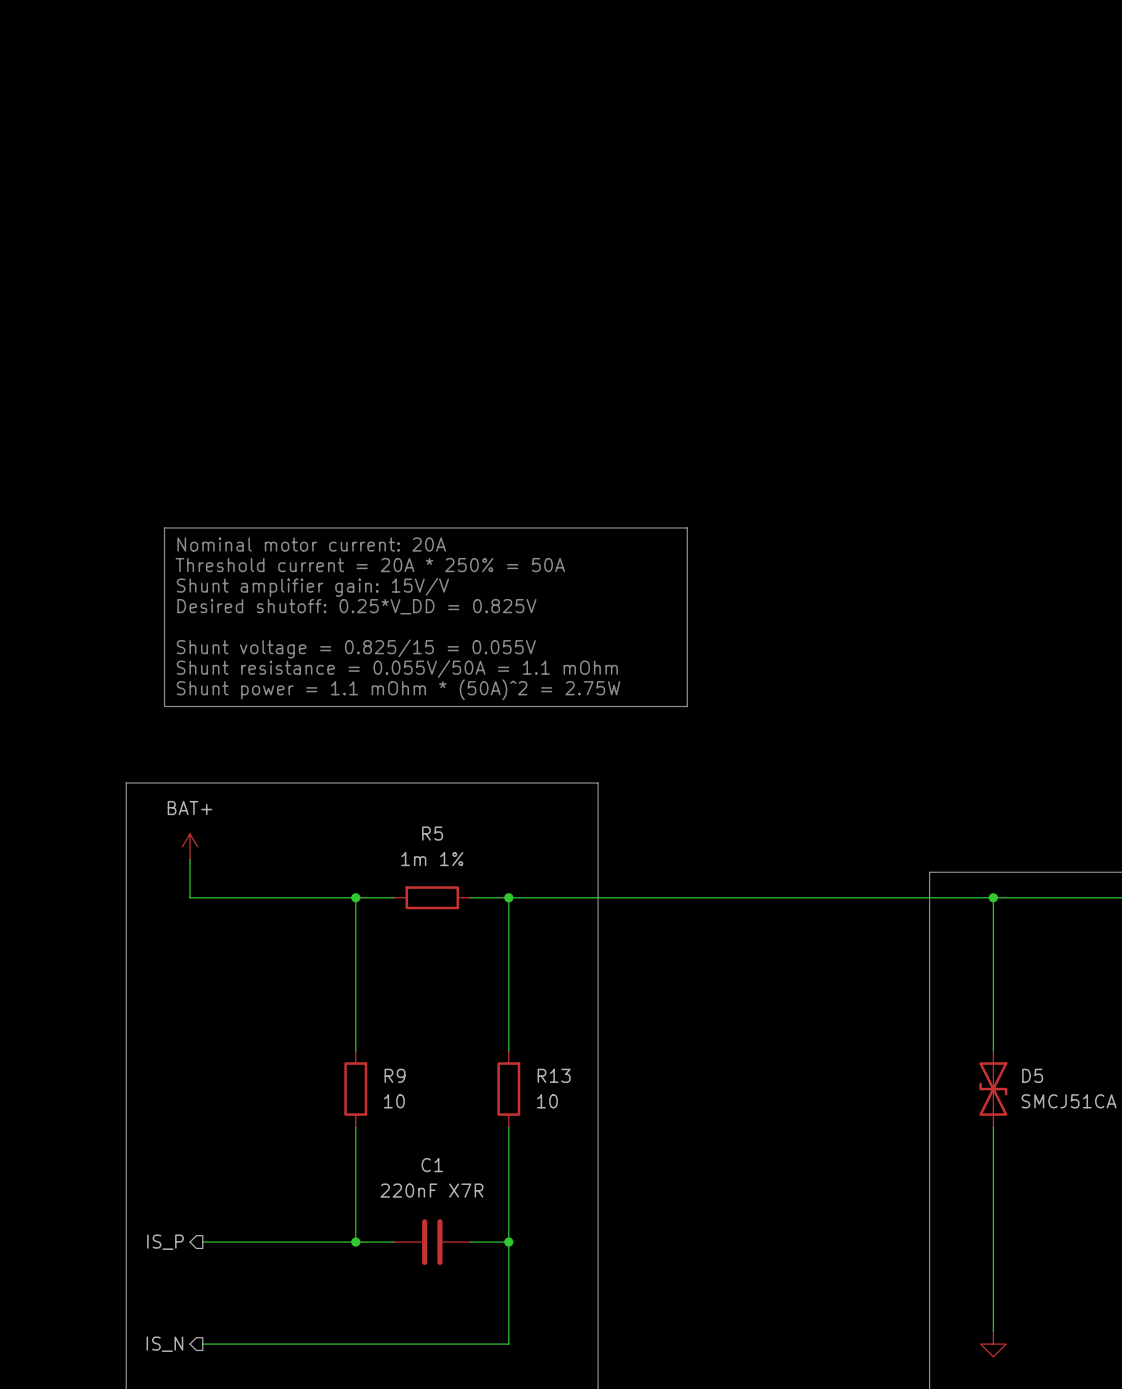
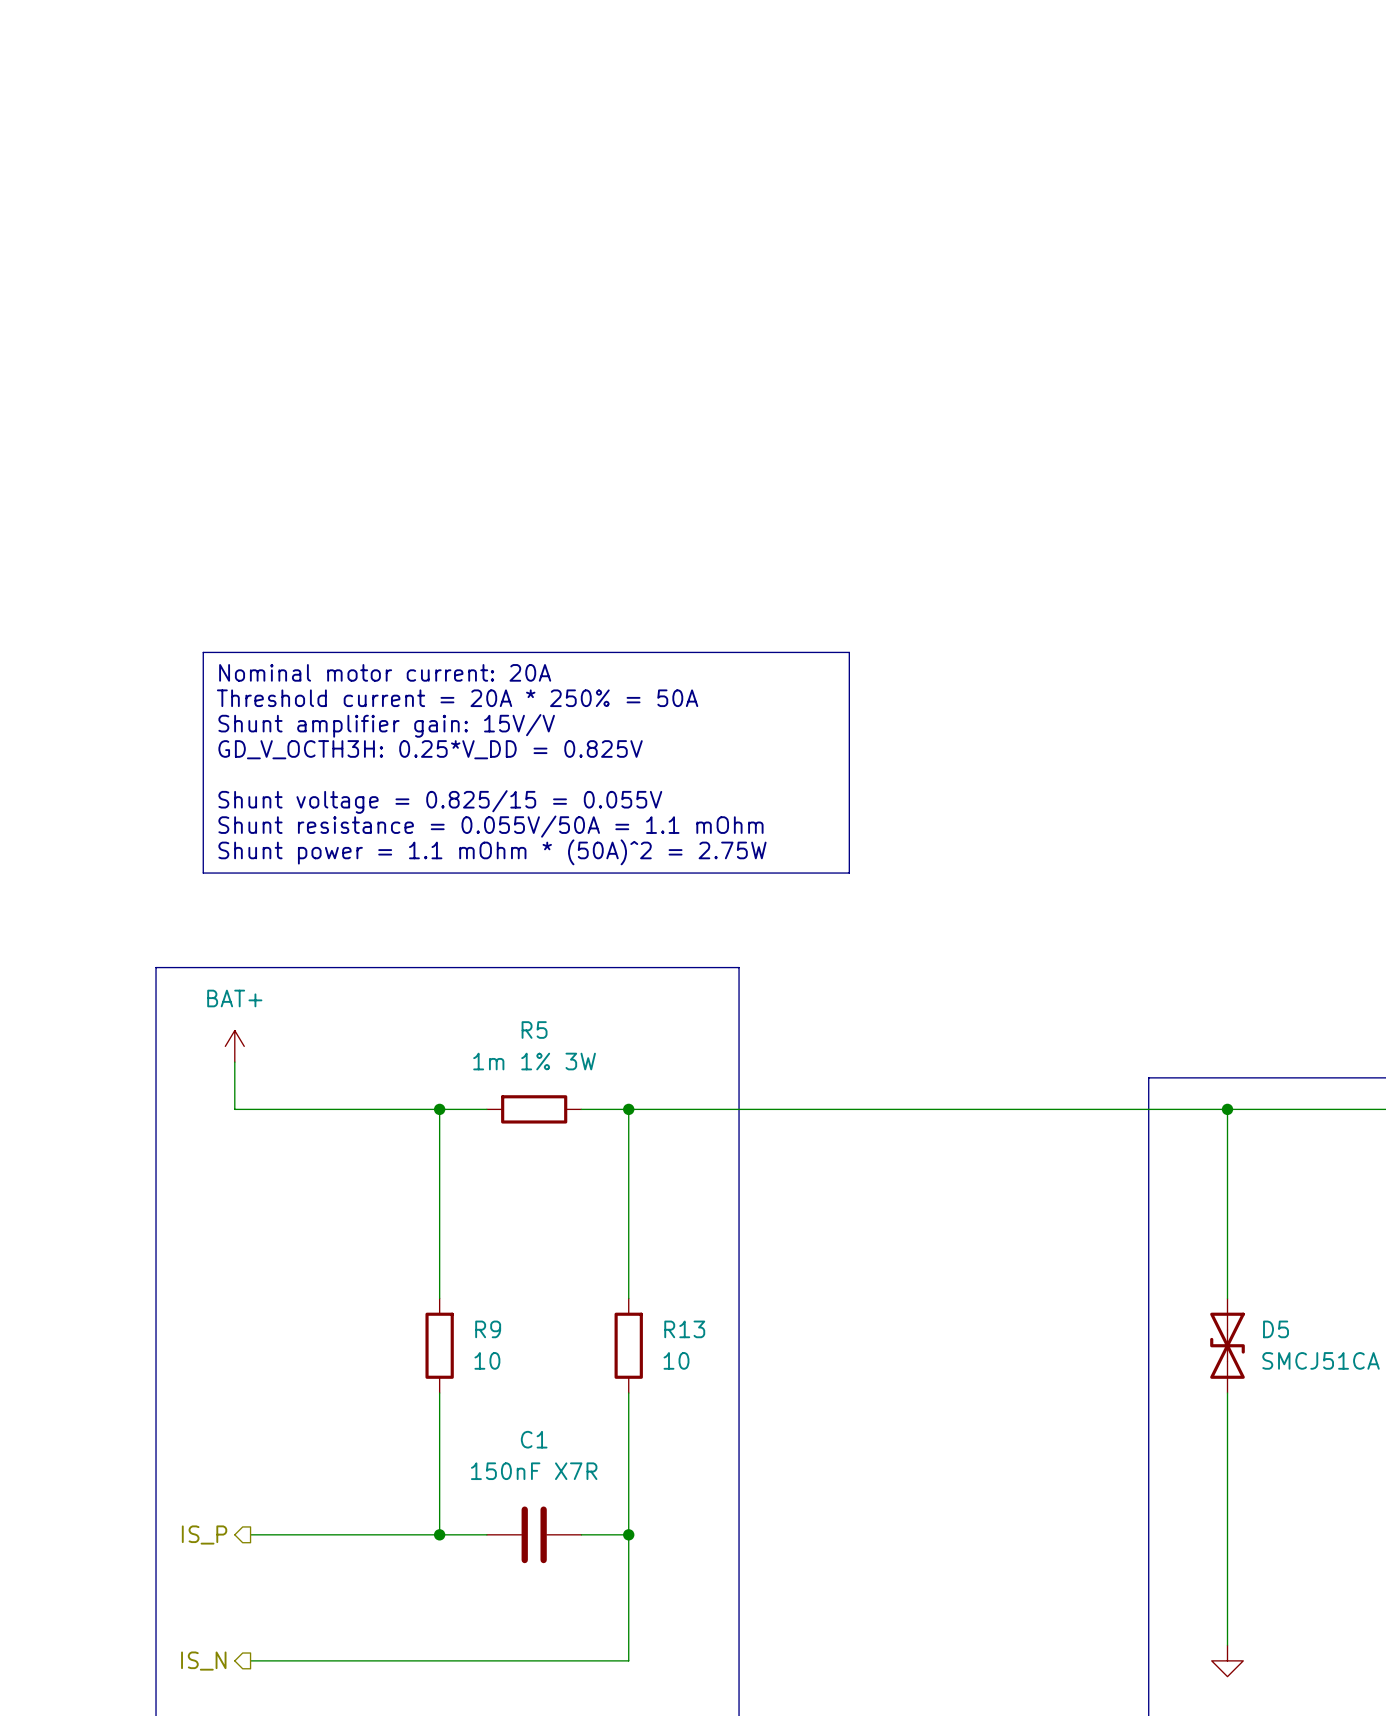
text: Desired shutoff: 0.25*V_DD = 0.825V (356, 606) -> GD_V_OCTH3H: 0.25*V_DD = 0.825V (430, 749)
R5 value: 1m 1% (432, 859) -> 1m 1% 3W (534, 1061)
C1 value: 220nF X7R (431, 1190) -> 150nF X7R (534, 1471)

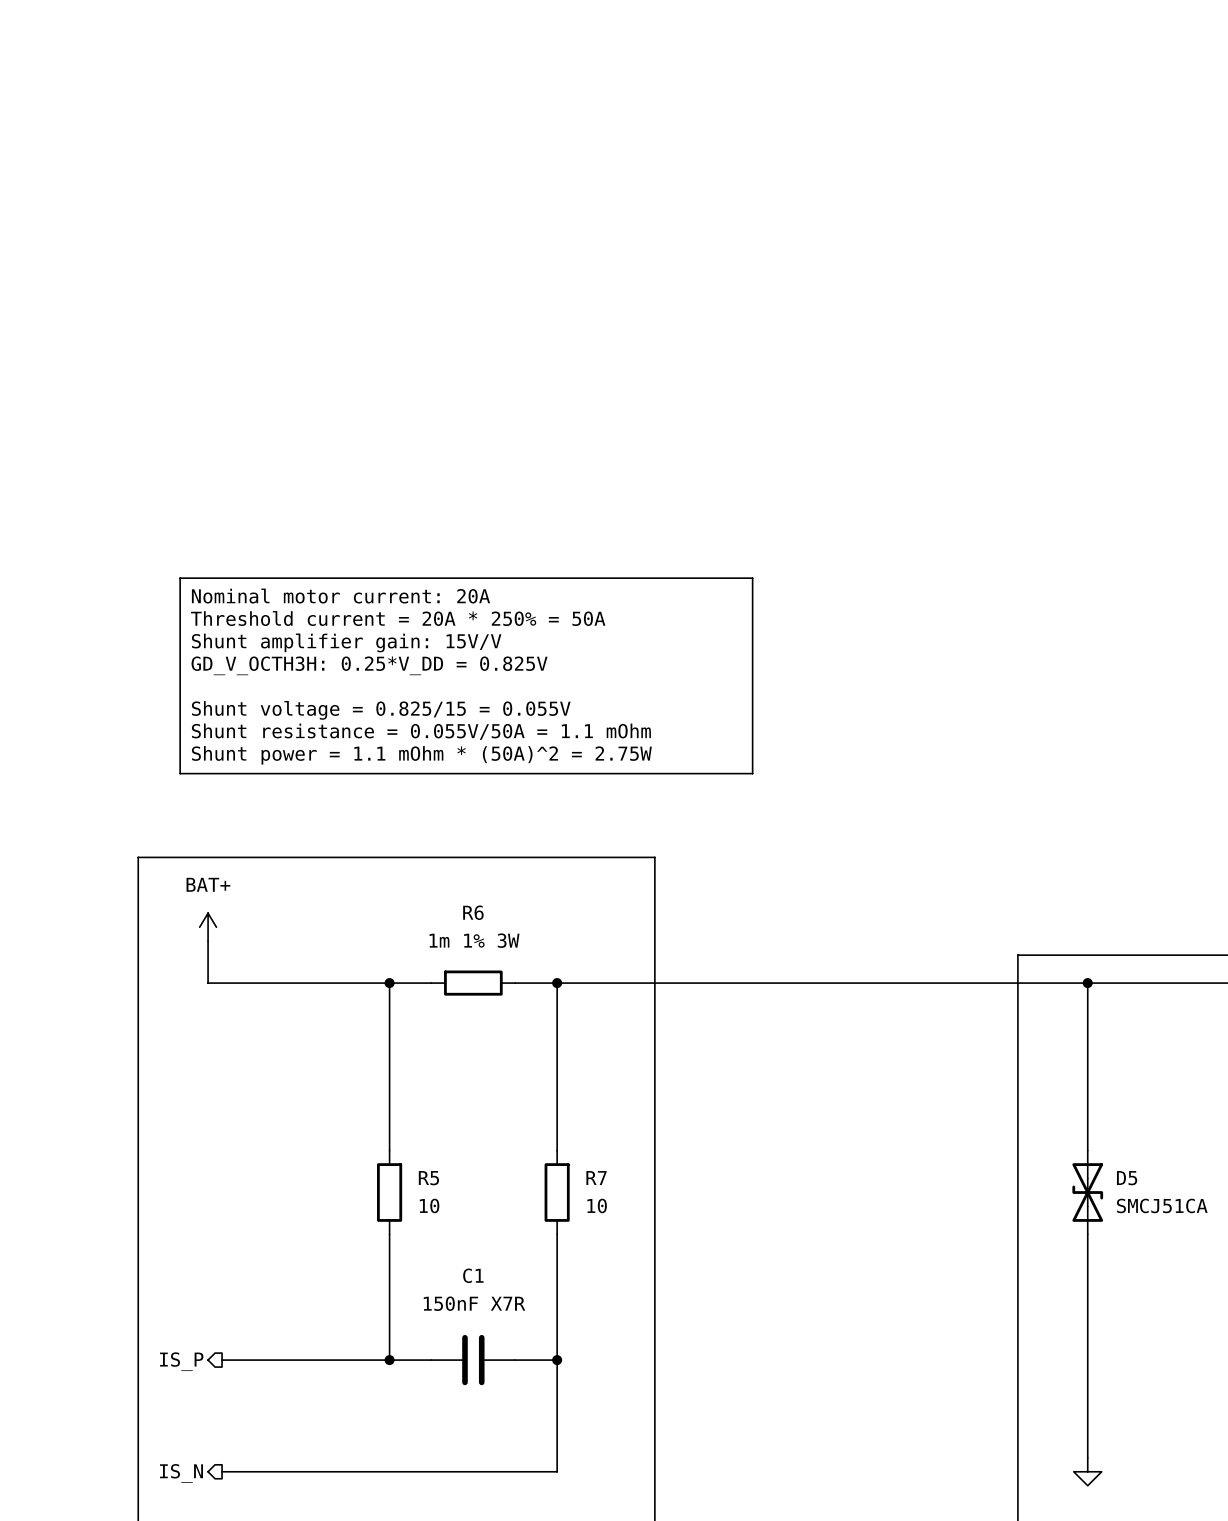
R5 name: R5 (534, 1030) -> R6 (473, 912)
R9 name: R9 (488, 1329) -> R5 (428, 1178)
R13 name: R13 (684, 1329) -> R7 (596, 1178)

